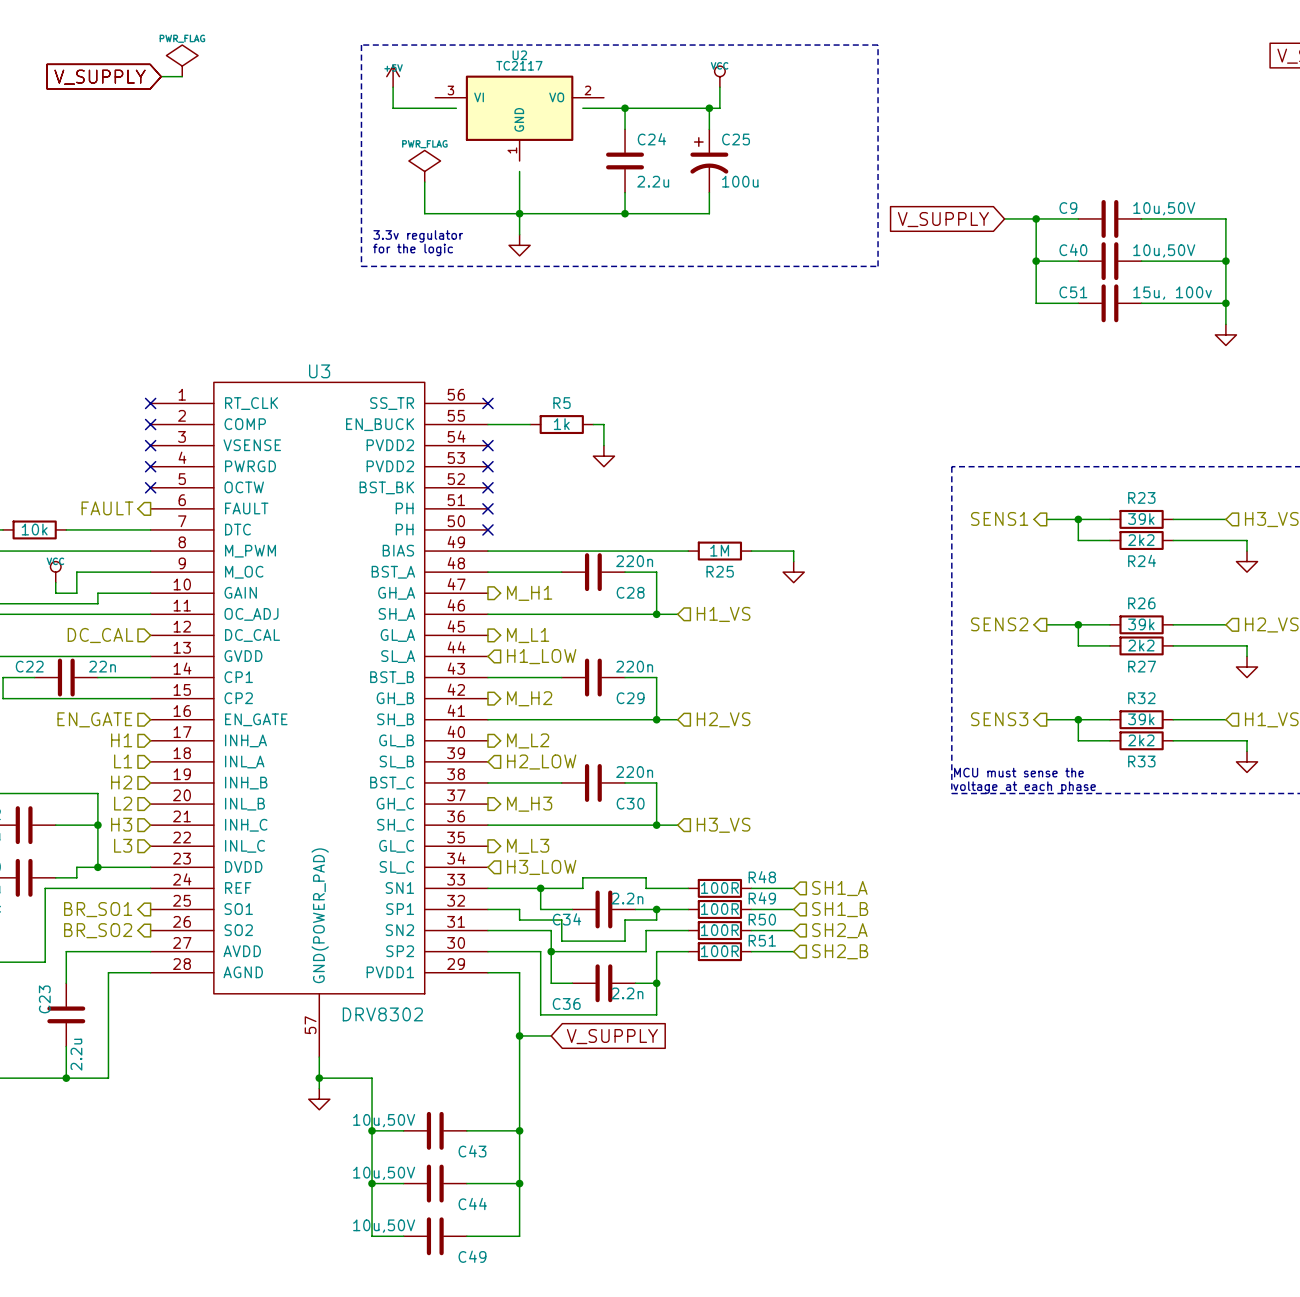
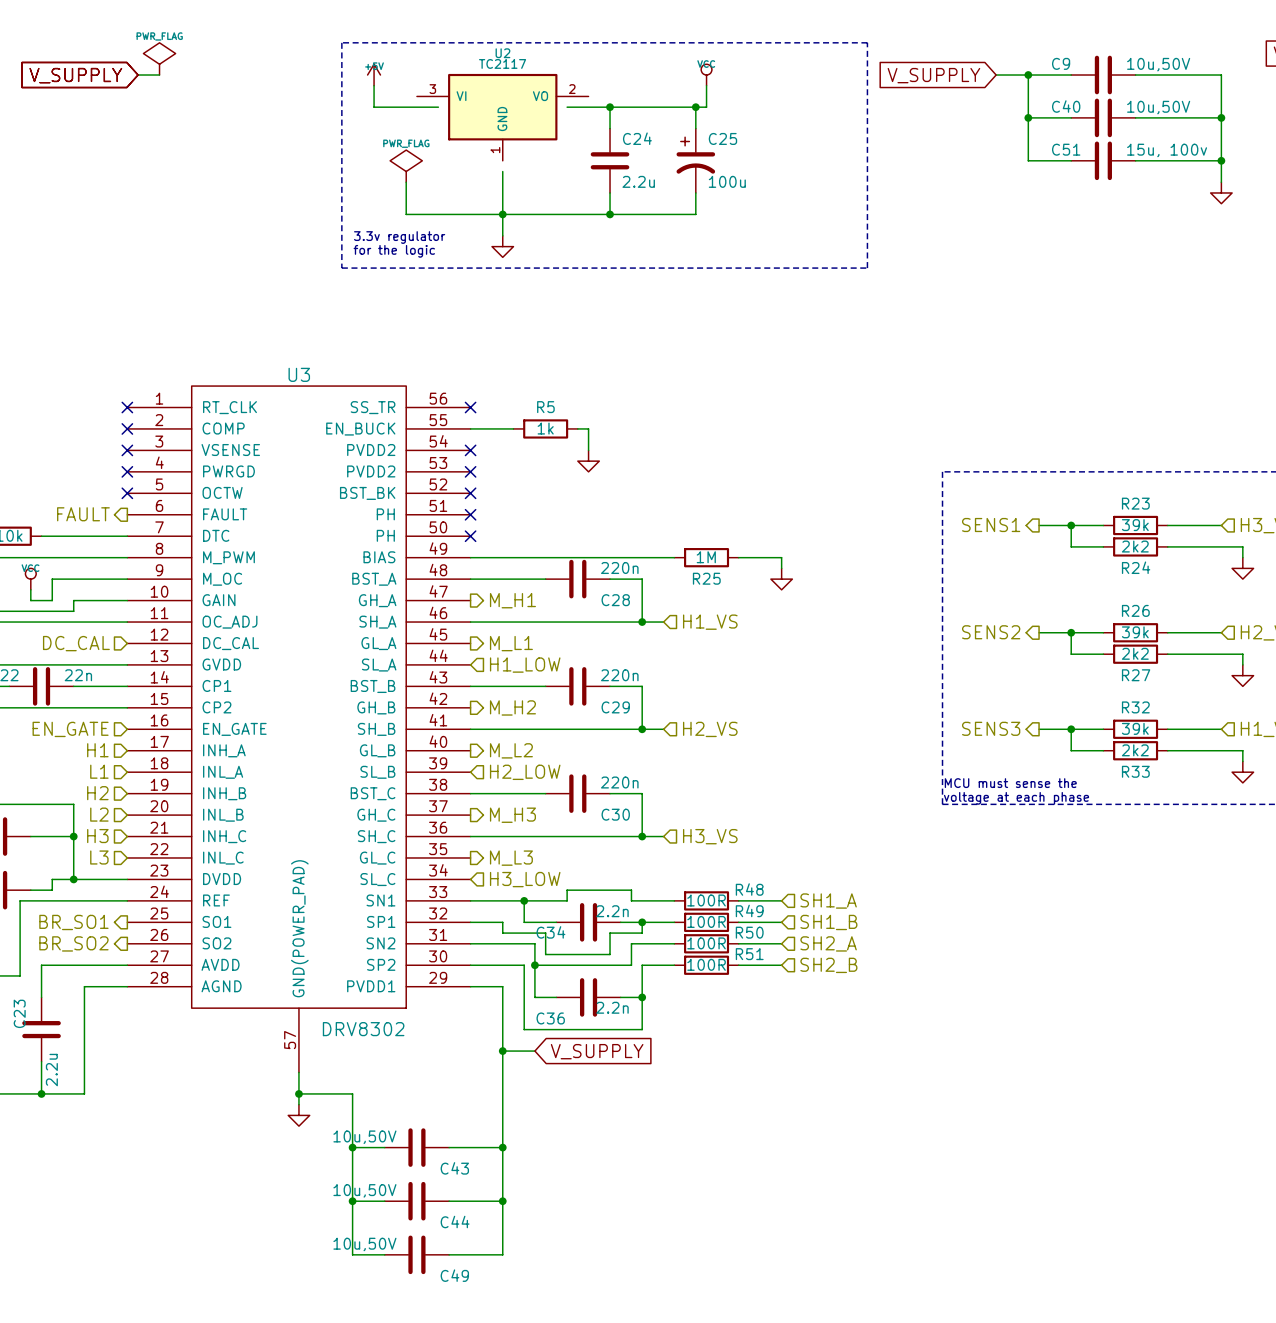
junction: none -> (1028, 75)
junction: none -> (1028, 117)
junction: none -> (1221, 117)
junction: none -> (1221, 160)
wire: (1004, 218) (1078, 218) -> (996, 75) (1071, 75)
wire: (1036, 218) (1036, 303) (1078, 303) -> (1028, 75) (1028, 160) (1071, 160)
junction: (1036, 218) -> none
C9 position: (1109, 218) -> (1103, 75)
wire: (1141, 218) (1225, 218) (1225, 324) -> (1135, 75) (1221, 75) (1221, 182)
global label position: V_SUPPLY (943, 219) -> V_SUPPLY (933, 75)
wire: (1036, 261) (1078, 261) -> (1028, 117) (1071, 117)
junction: (1036, 261) -> none
C40 position: (1109, 261) -> (1103, 117)
wire: (1141, 261) (1225, 261) -> (1135, 117) (1221, 117)
junction: (1225, 261) -> none
C51 position: (1109, 303) -> (1103, 160)
wire: (1141, 303) (1225, 303) -> (1135, 160) (1221, 160)
junction: (1225, 303) -> none
power symbol position: (1225, 334) -> (1221, 192)

